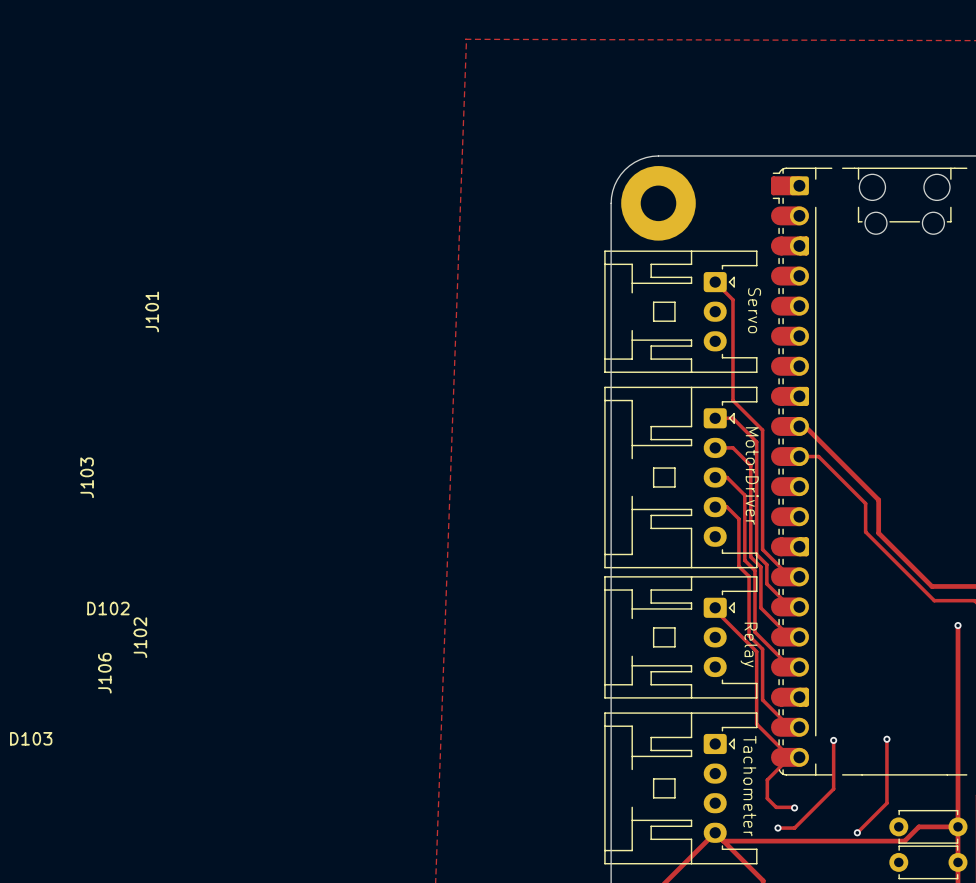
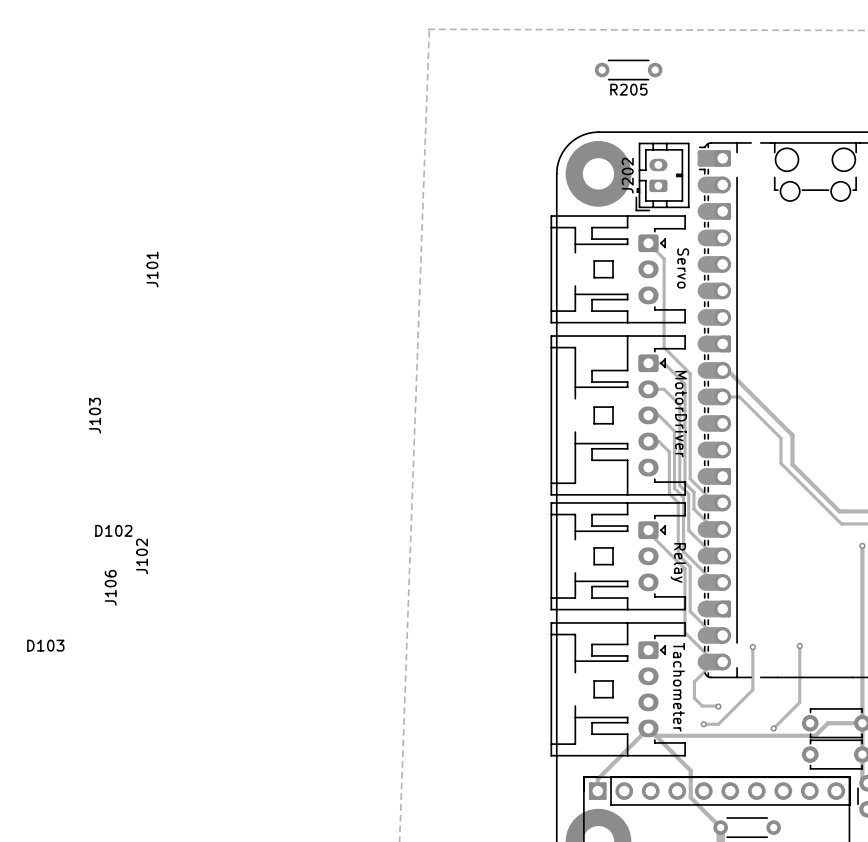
R205: none -> (628, 70)
J202: none -> (662, 176)

